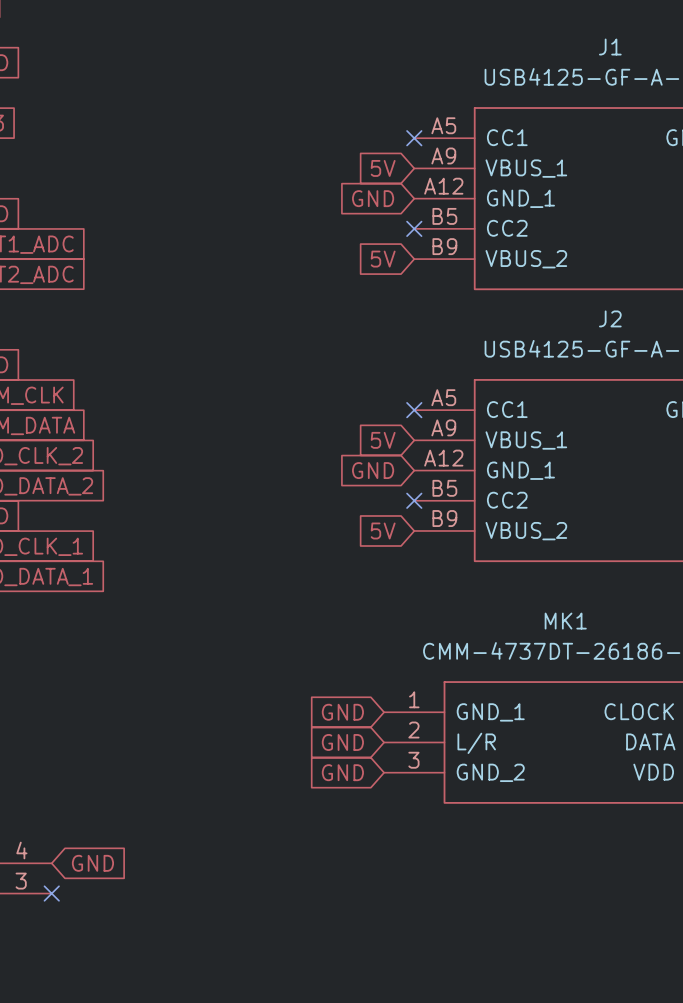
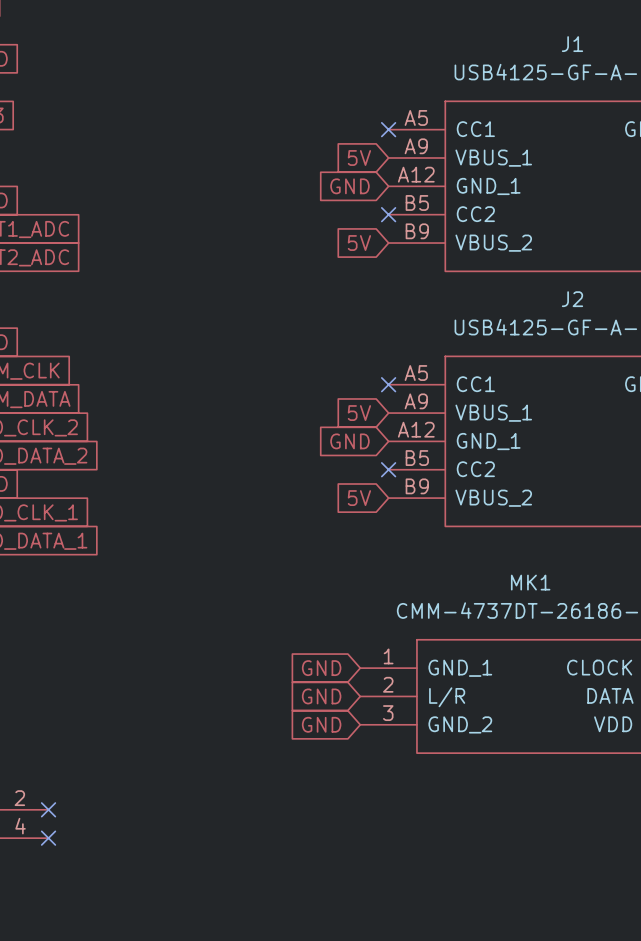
part pin number: 4 (21, 850) -> 2 (19, 798)
no-connect mark: none -> (48, 809)
global label: GND (92, 863) -> none
part pin number: 3 (21, 881) -> 4 (20, 826)

